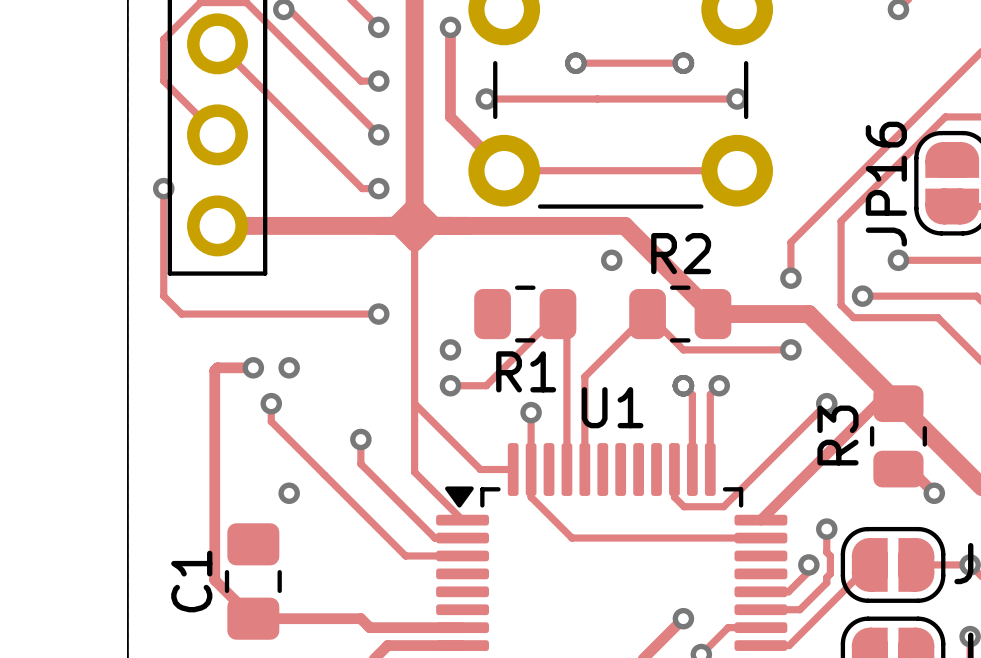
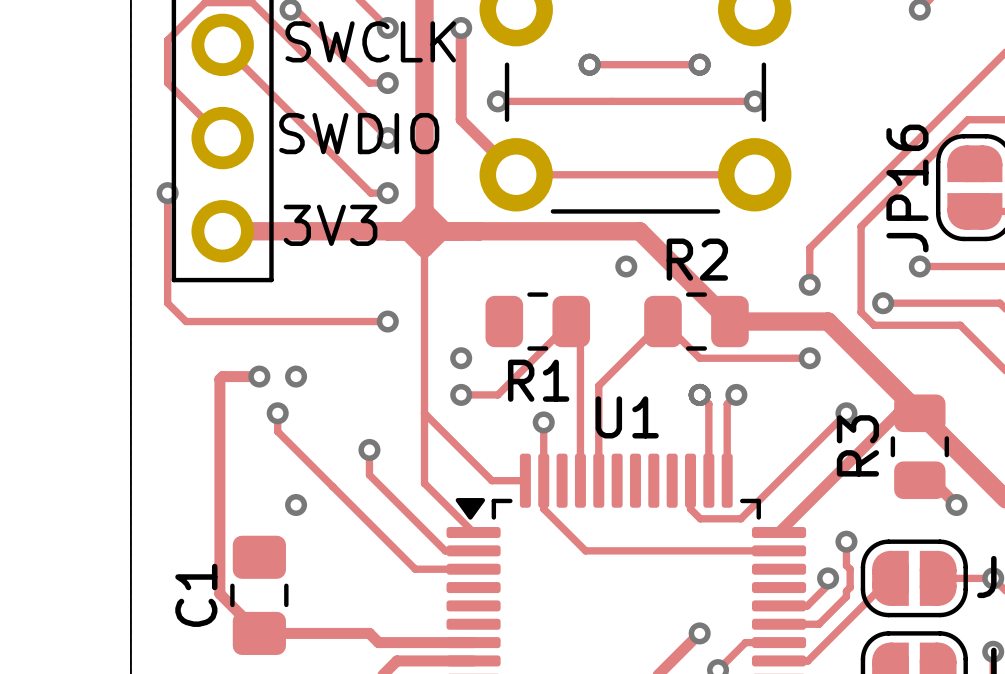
text: none -> SWCLK (370, 41)
text: none -> SWDIO (359, 133)
text: none -> 3V3 (330, 225)

